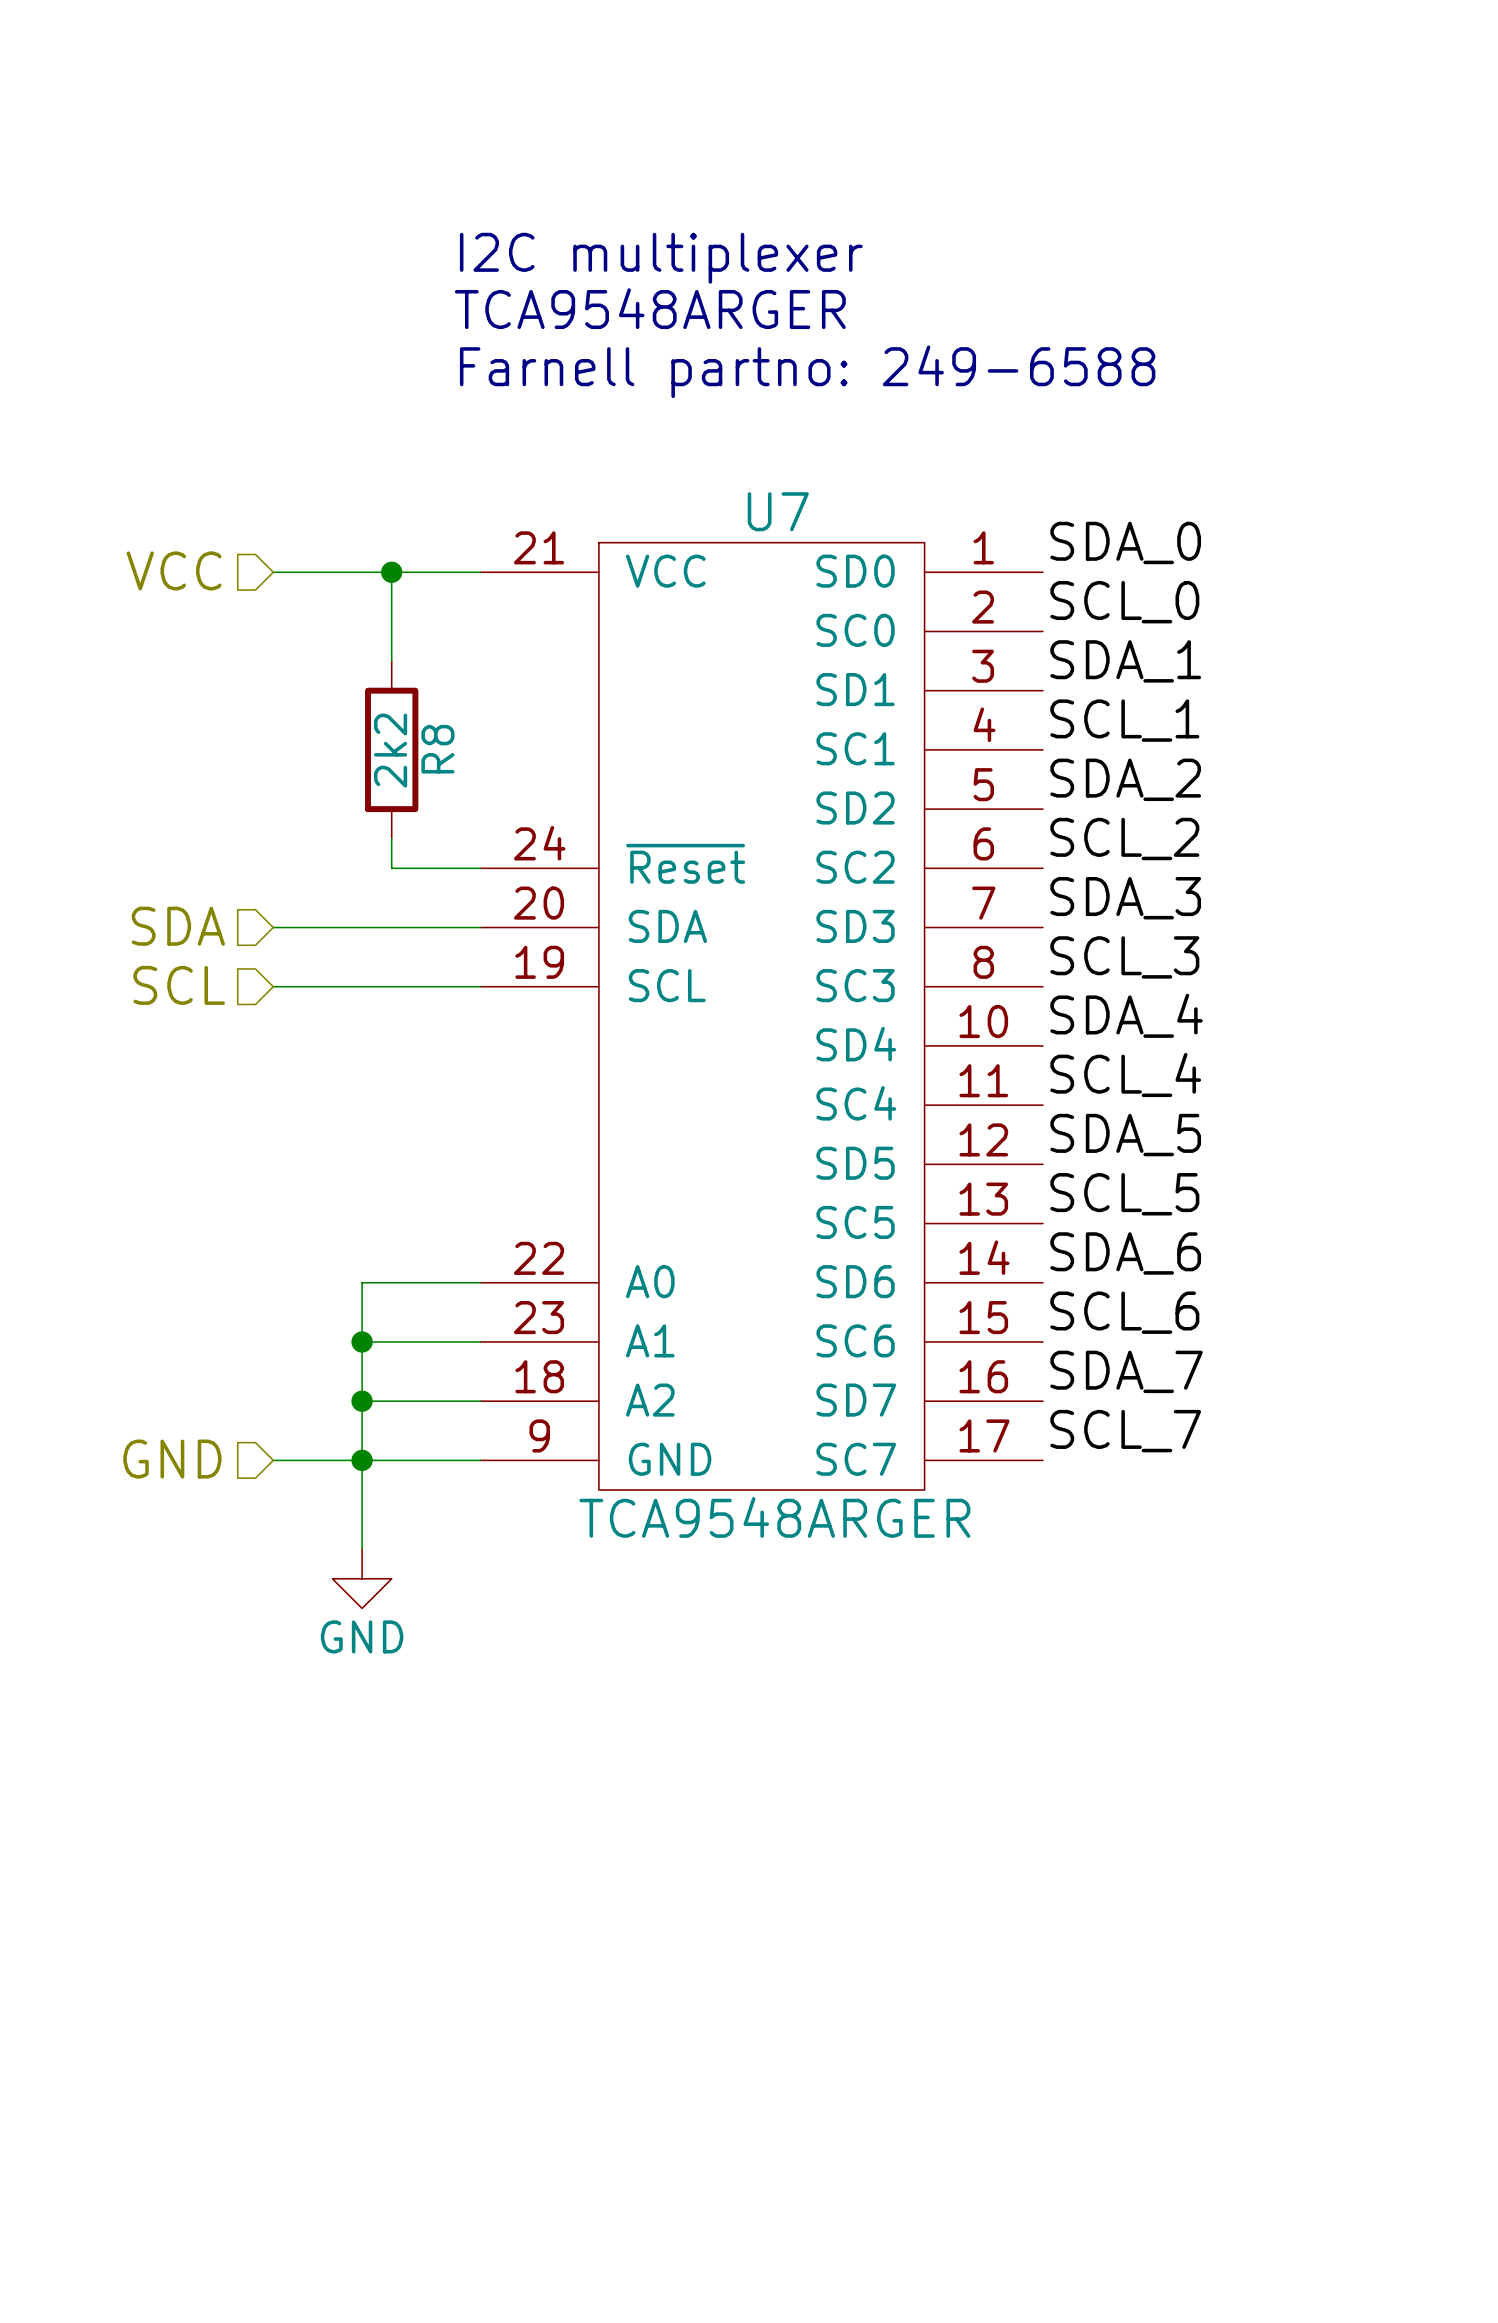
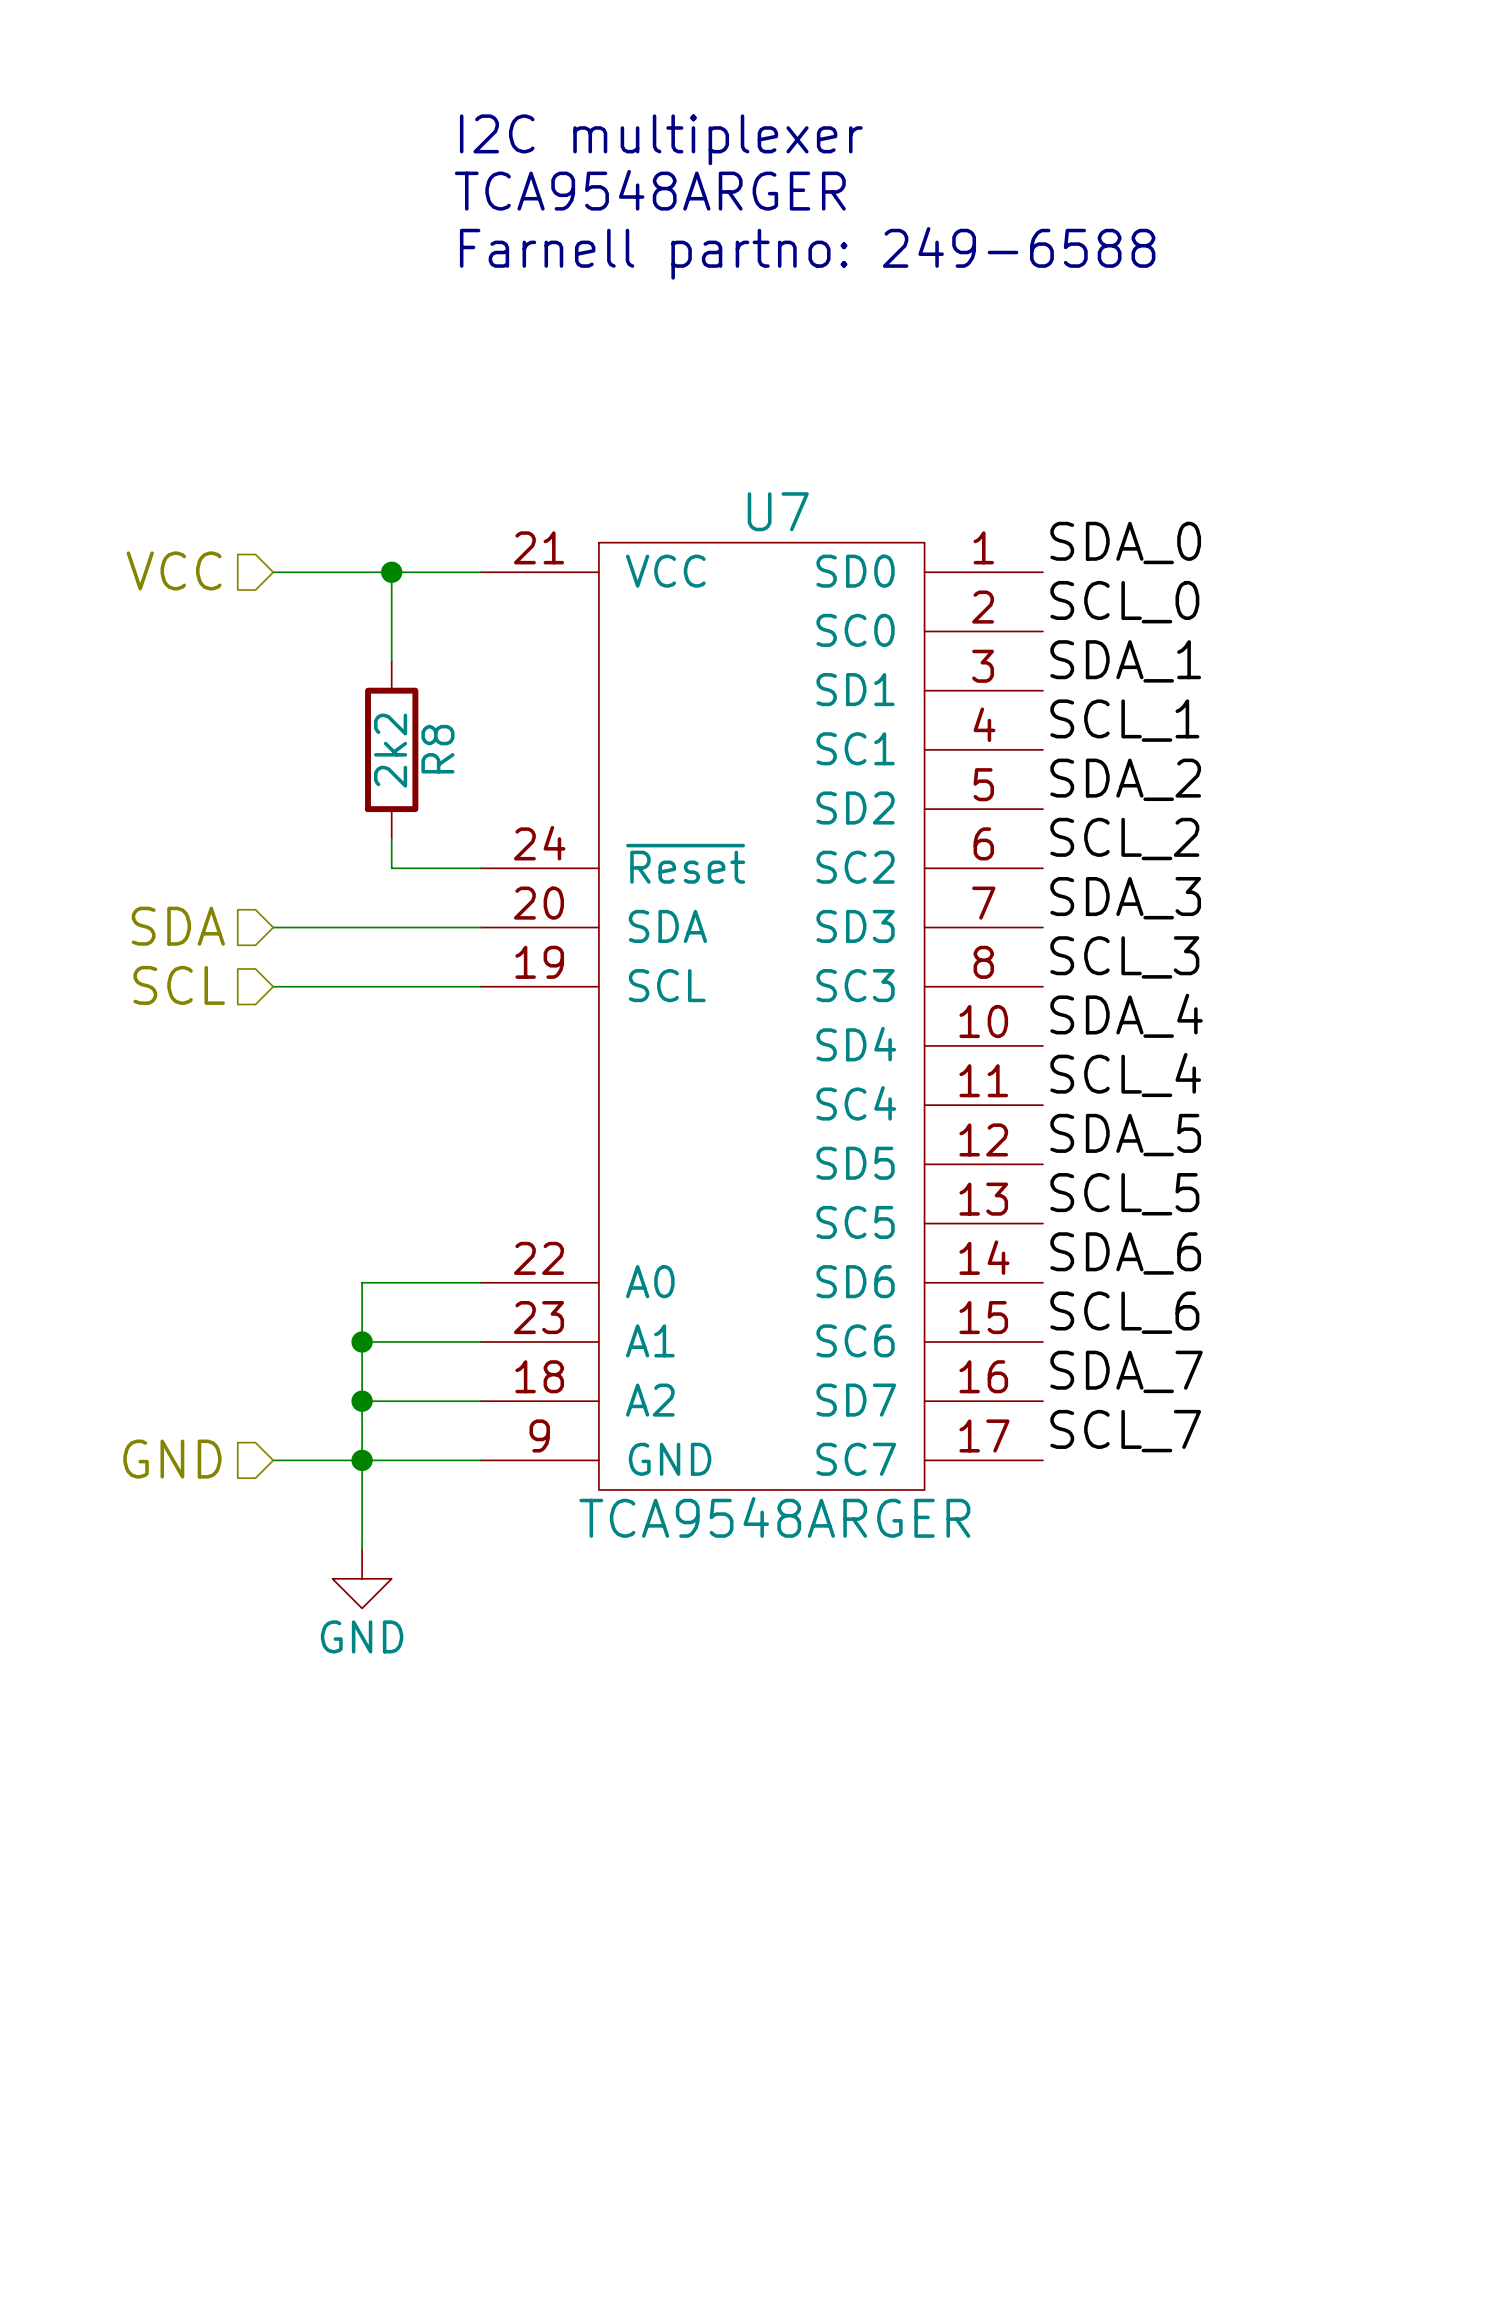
text: none -> I2C multiplexer (661, 139)
text: I2C multiplexer (661, 258) -> Farnell partno: 249-6588 (807, 253)
text position: TCA9548ARGER (650, 308) -> TCA9548ARGER (650, 190)
text: Farnell partno: 249-6588 (807, 371) -> none

